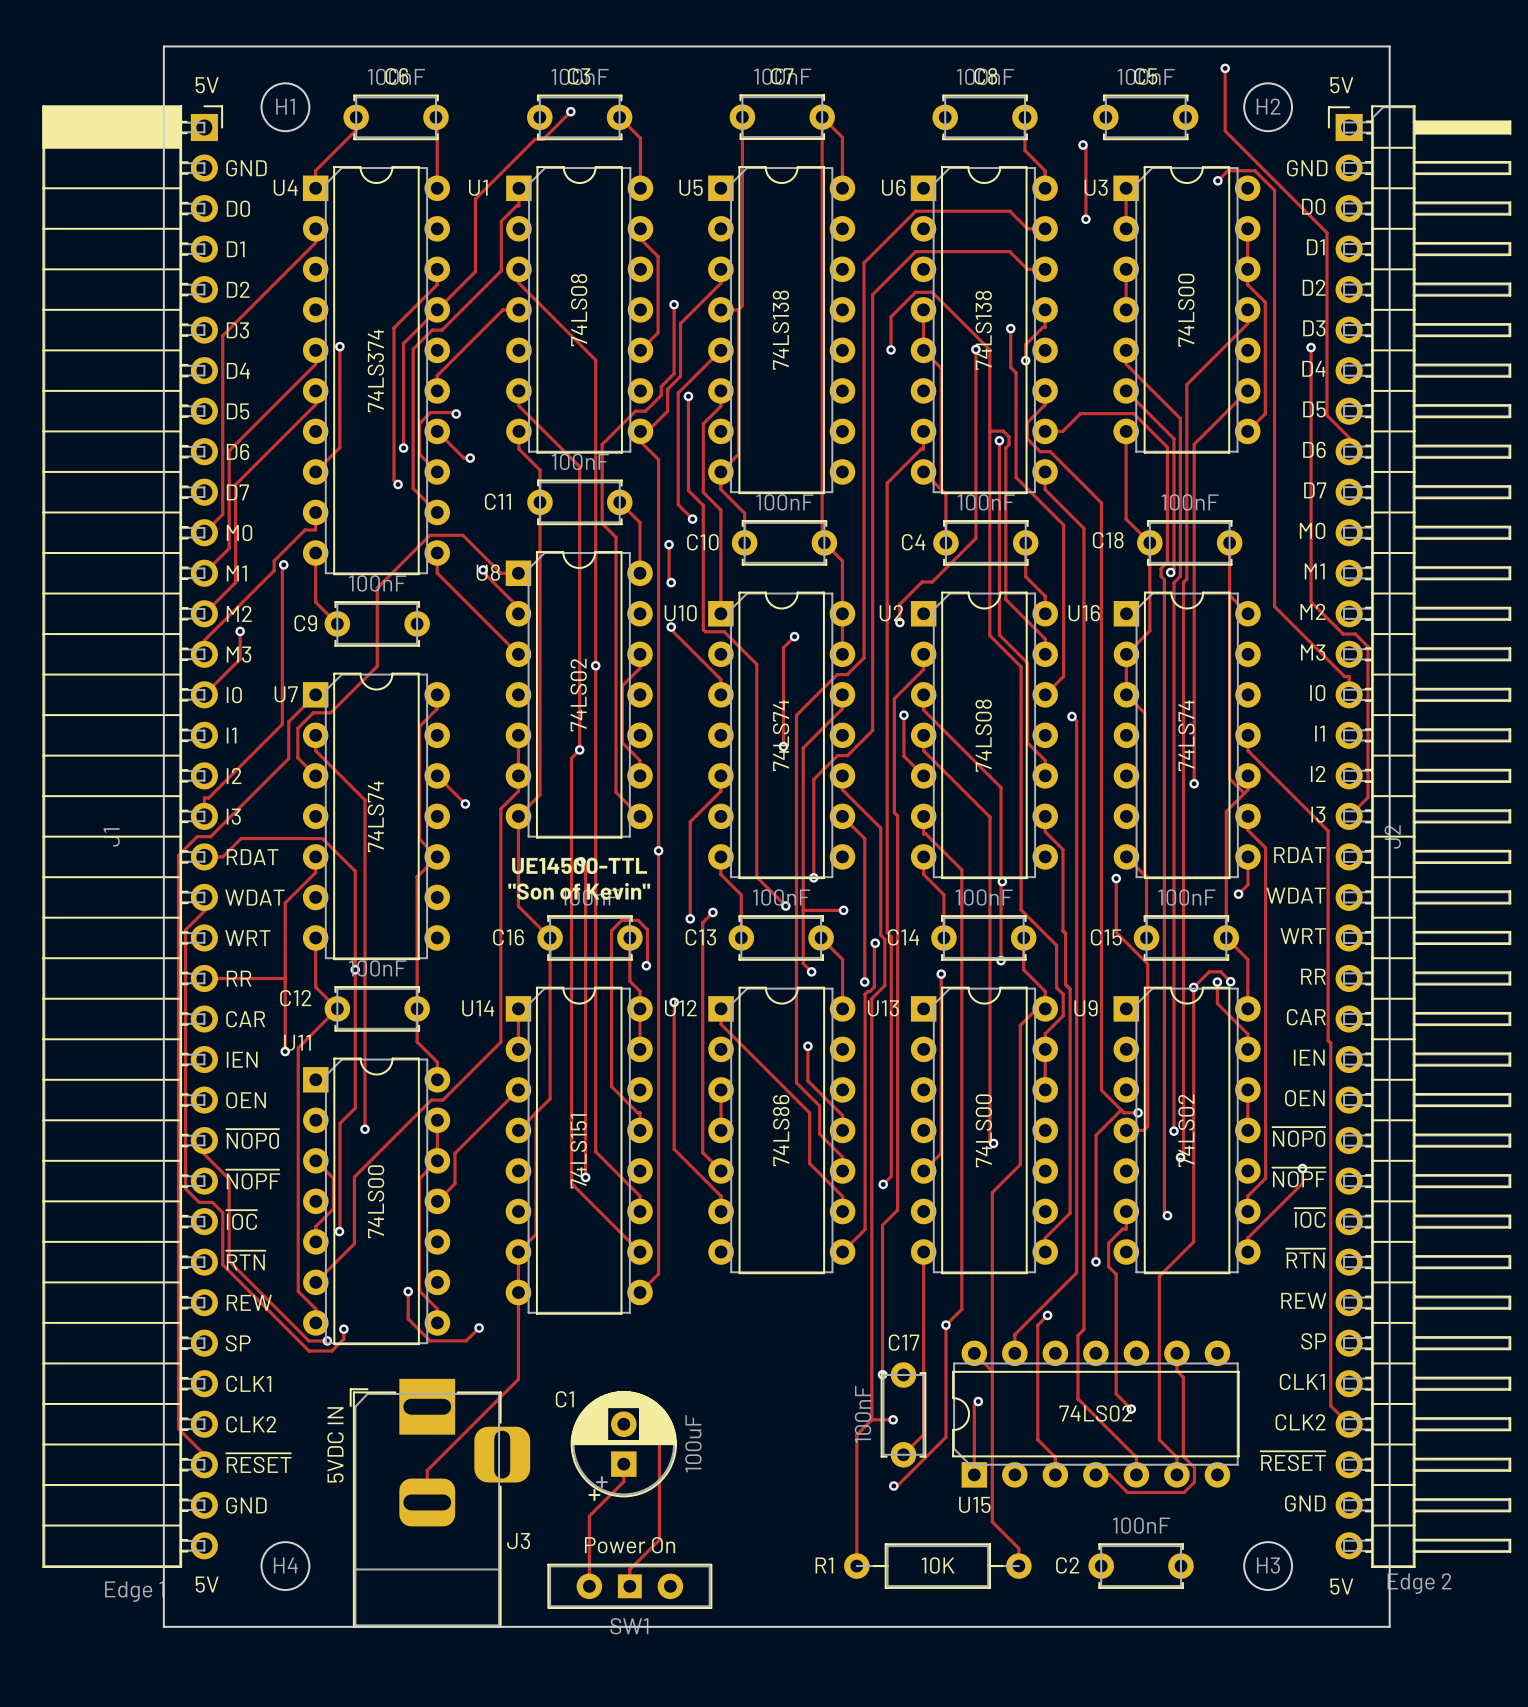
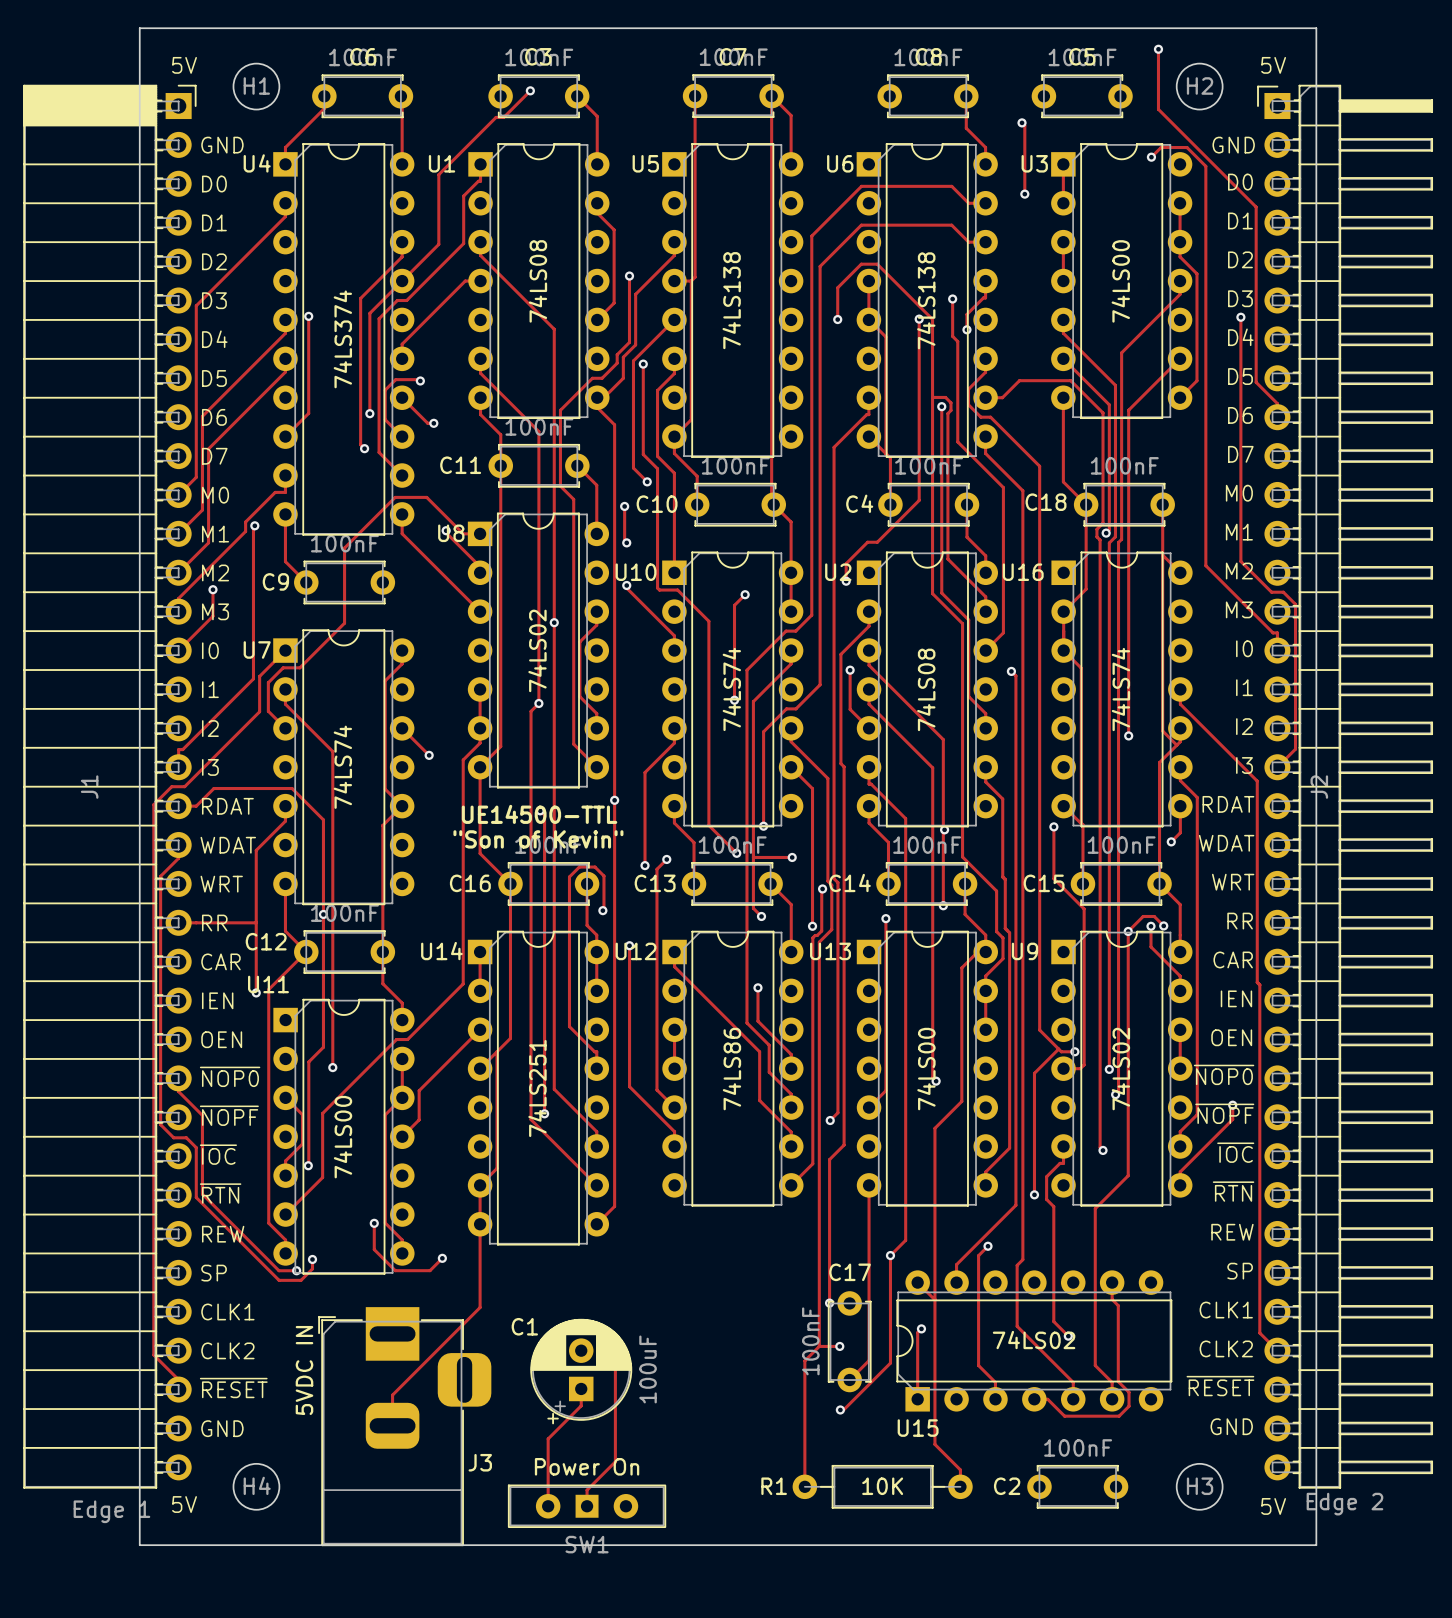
U14 value: 74LS151 (578, 1151) -> 74LS251 (537, 1088)

